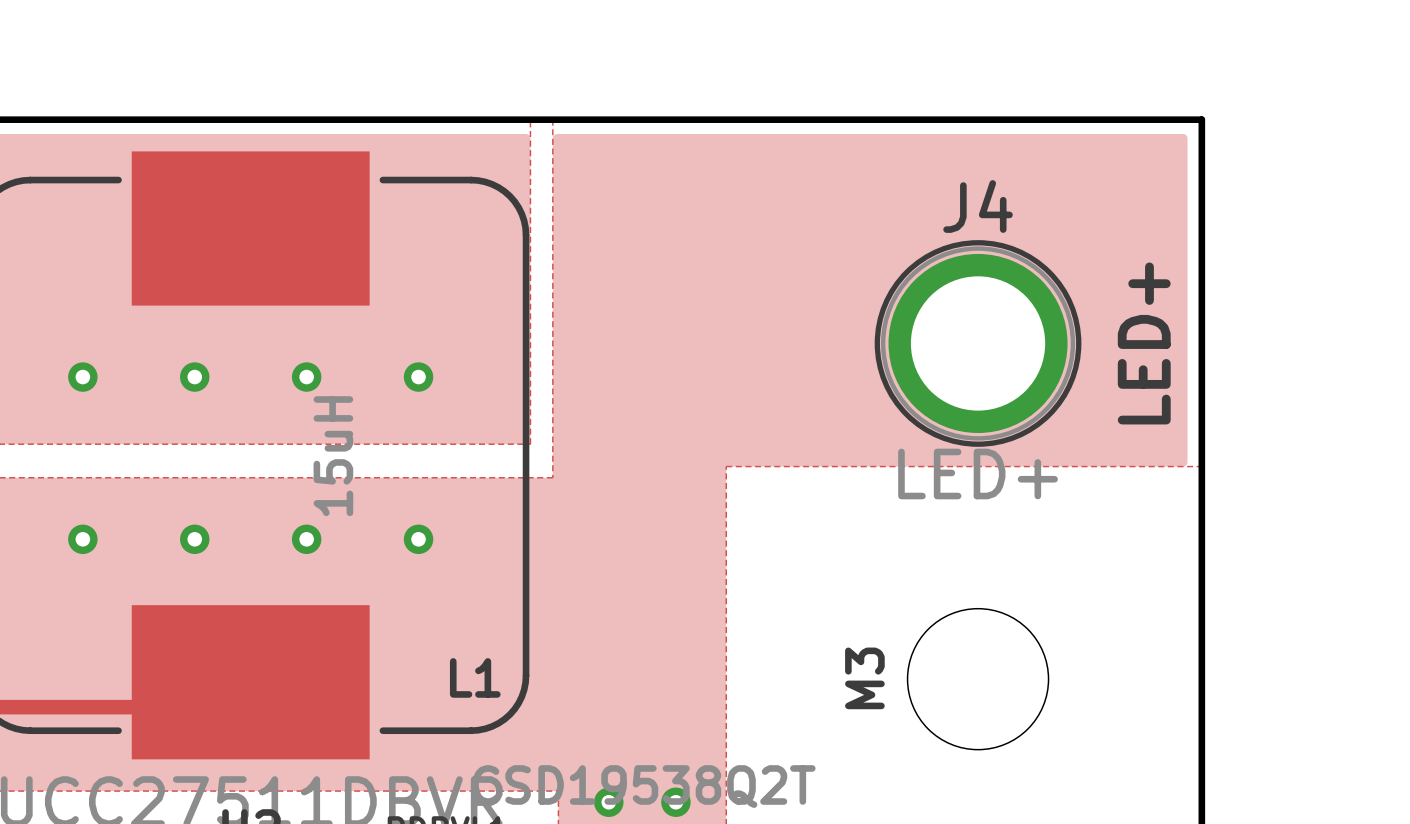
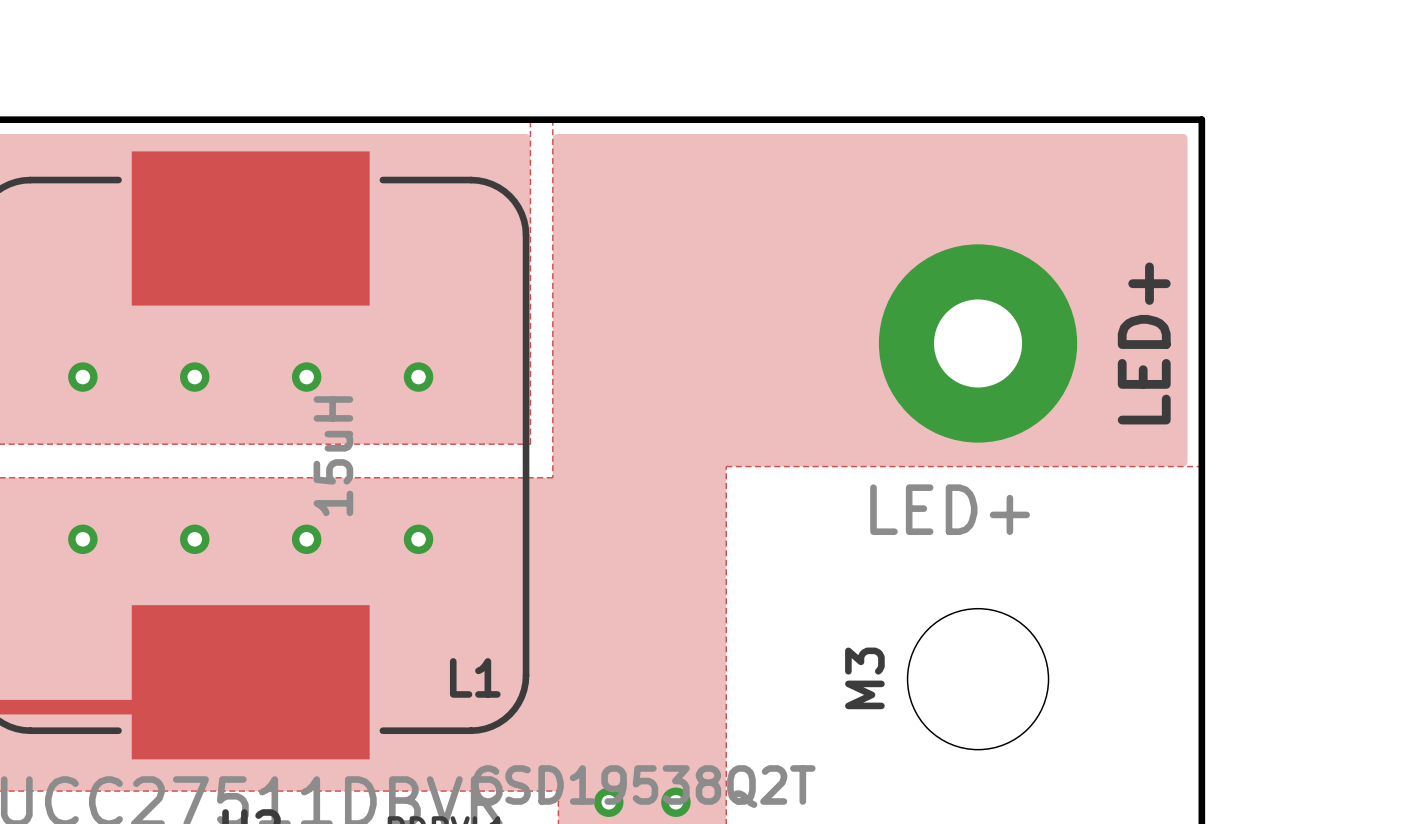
J4: LED+ (978, 343) -> none
part: none -> LED+ (978, 343)

